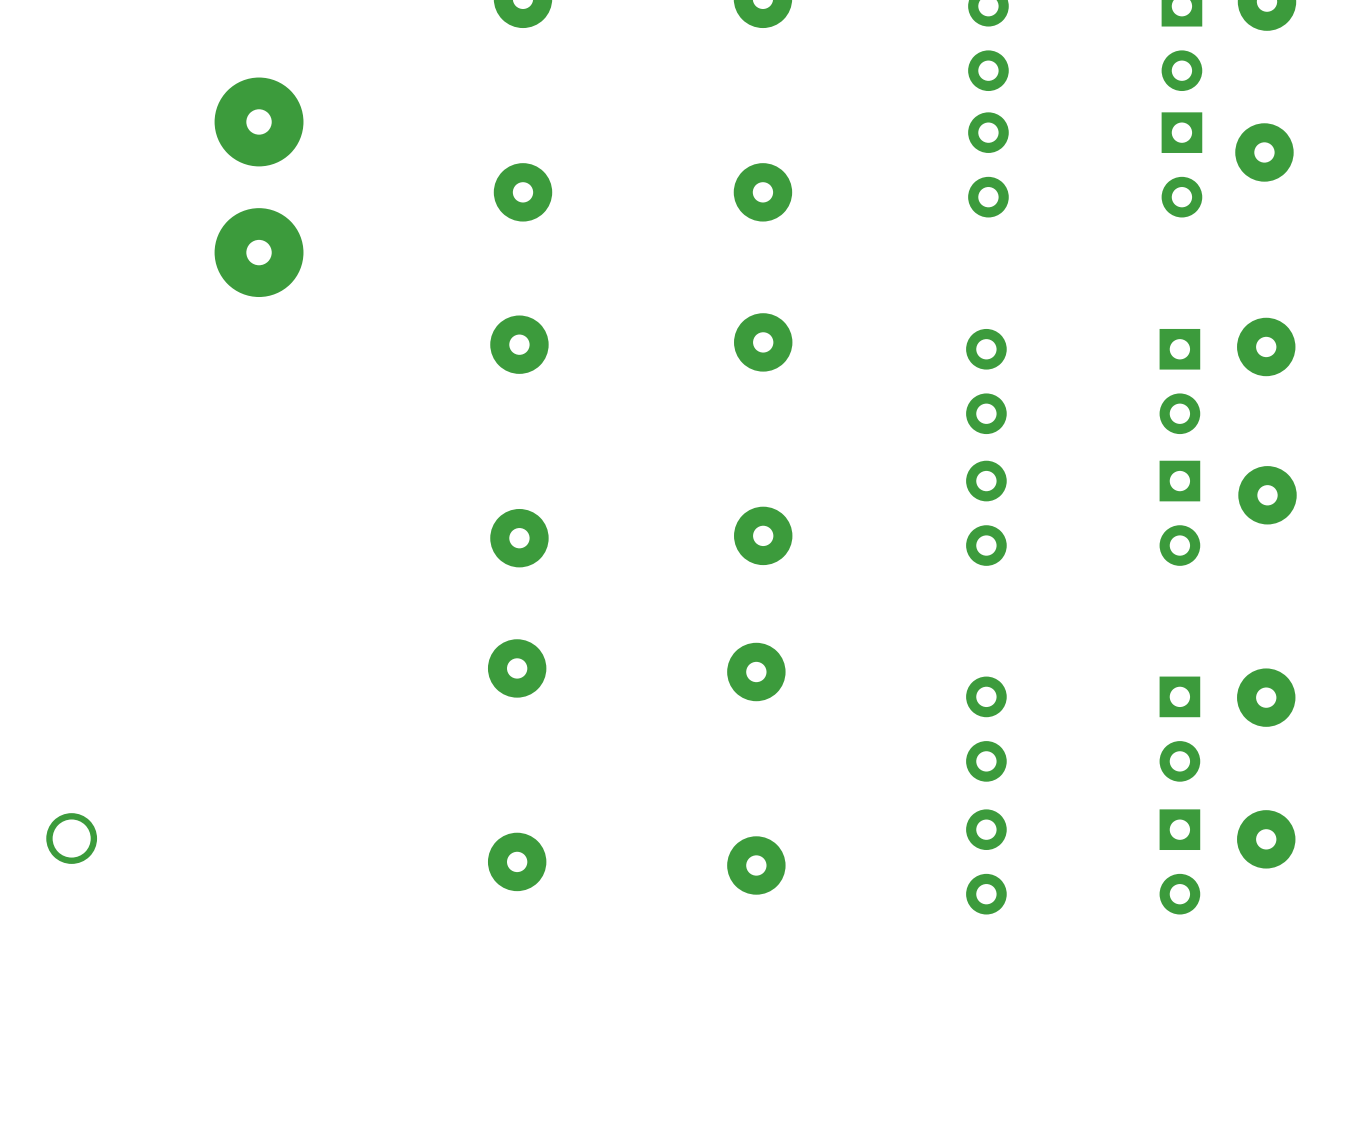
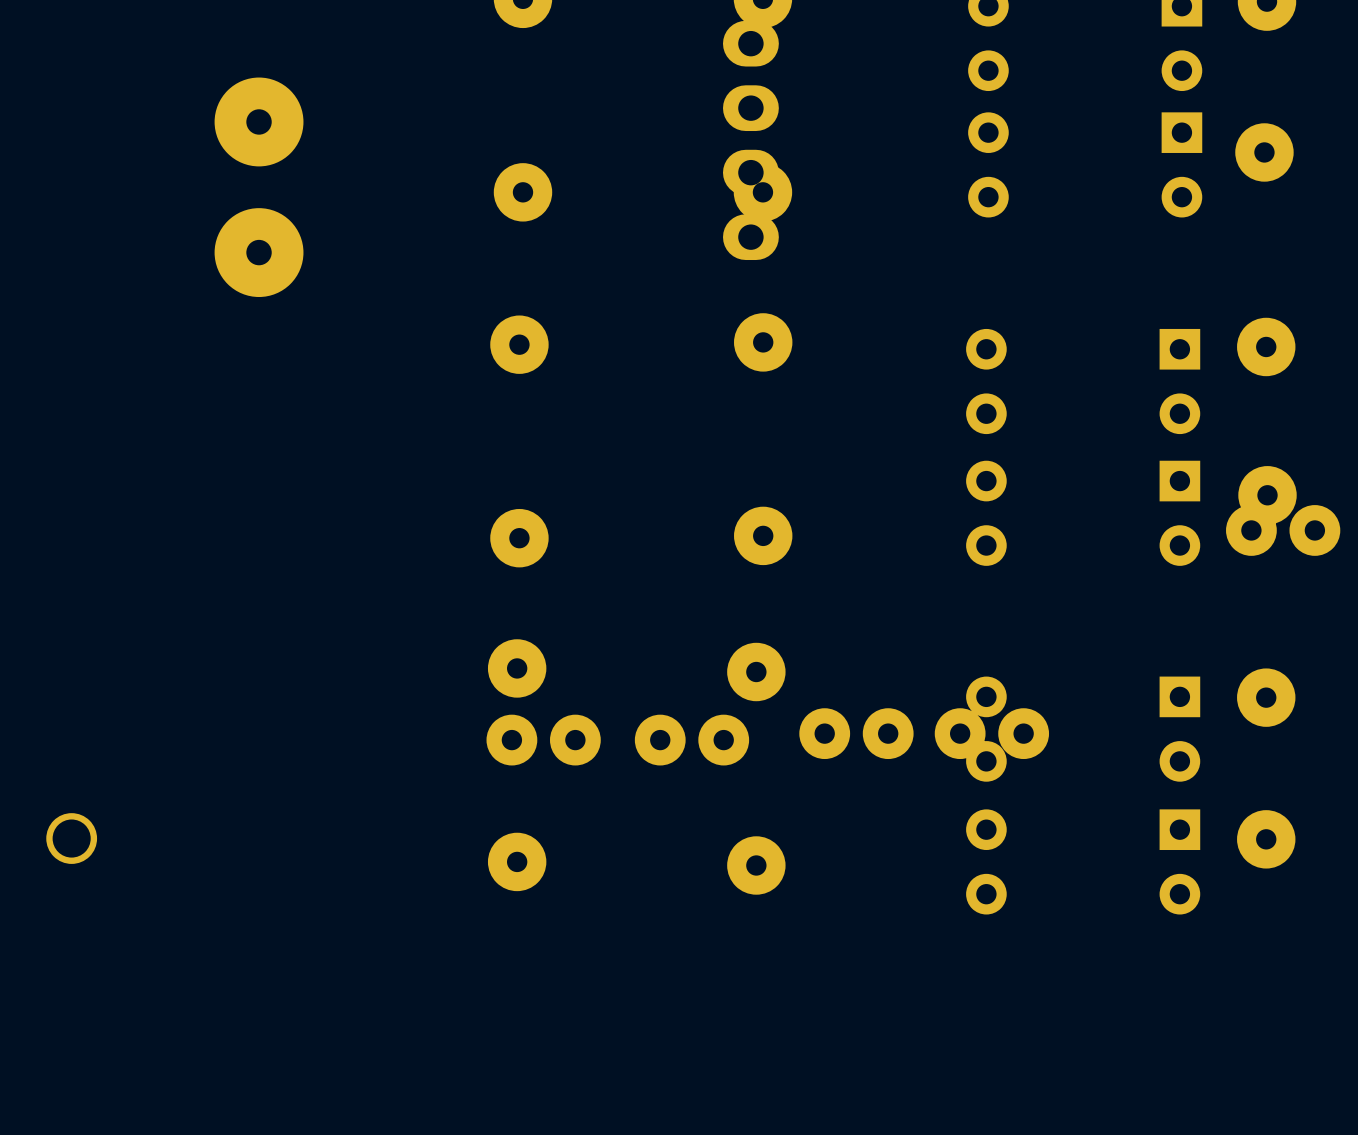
part: none -> (750, 140)
part: none -> (1283, 530)
part: none -> (856, 733)
part: none -> (991, 733)
part: none -> (543, 740)
part: none -> (691, 740)

